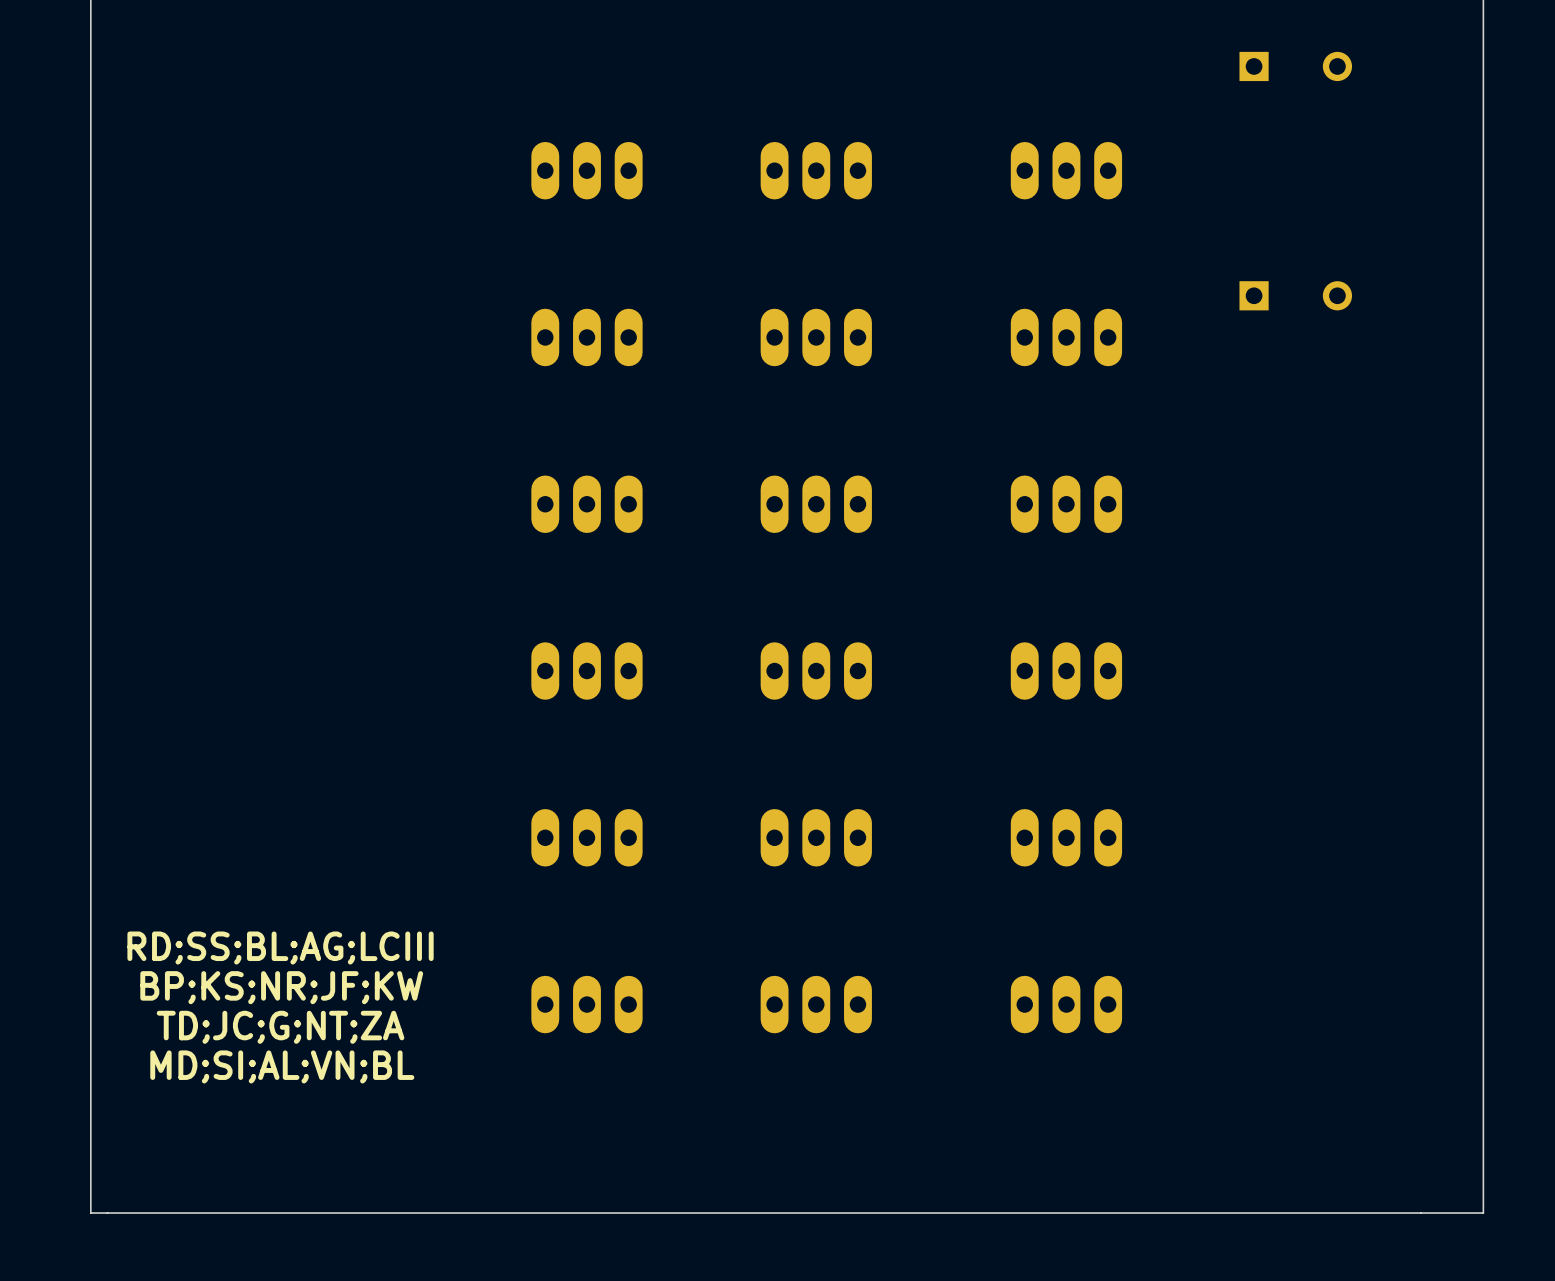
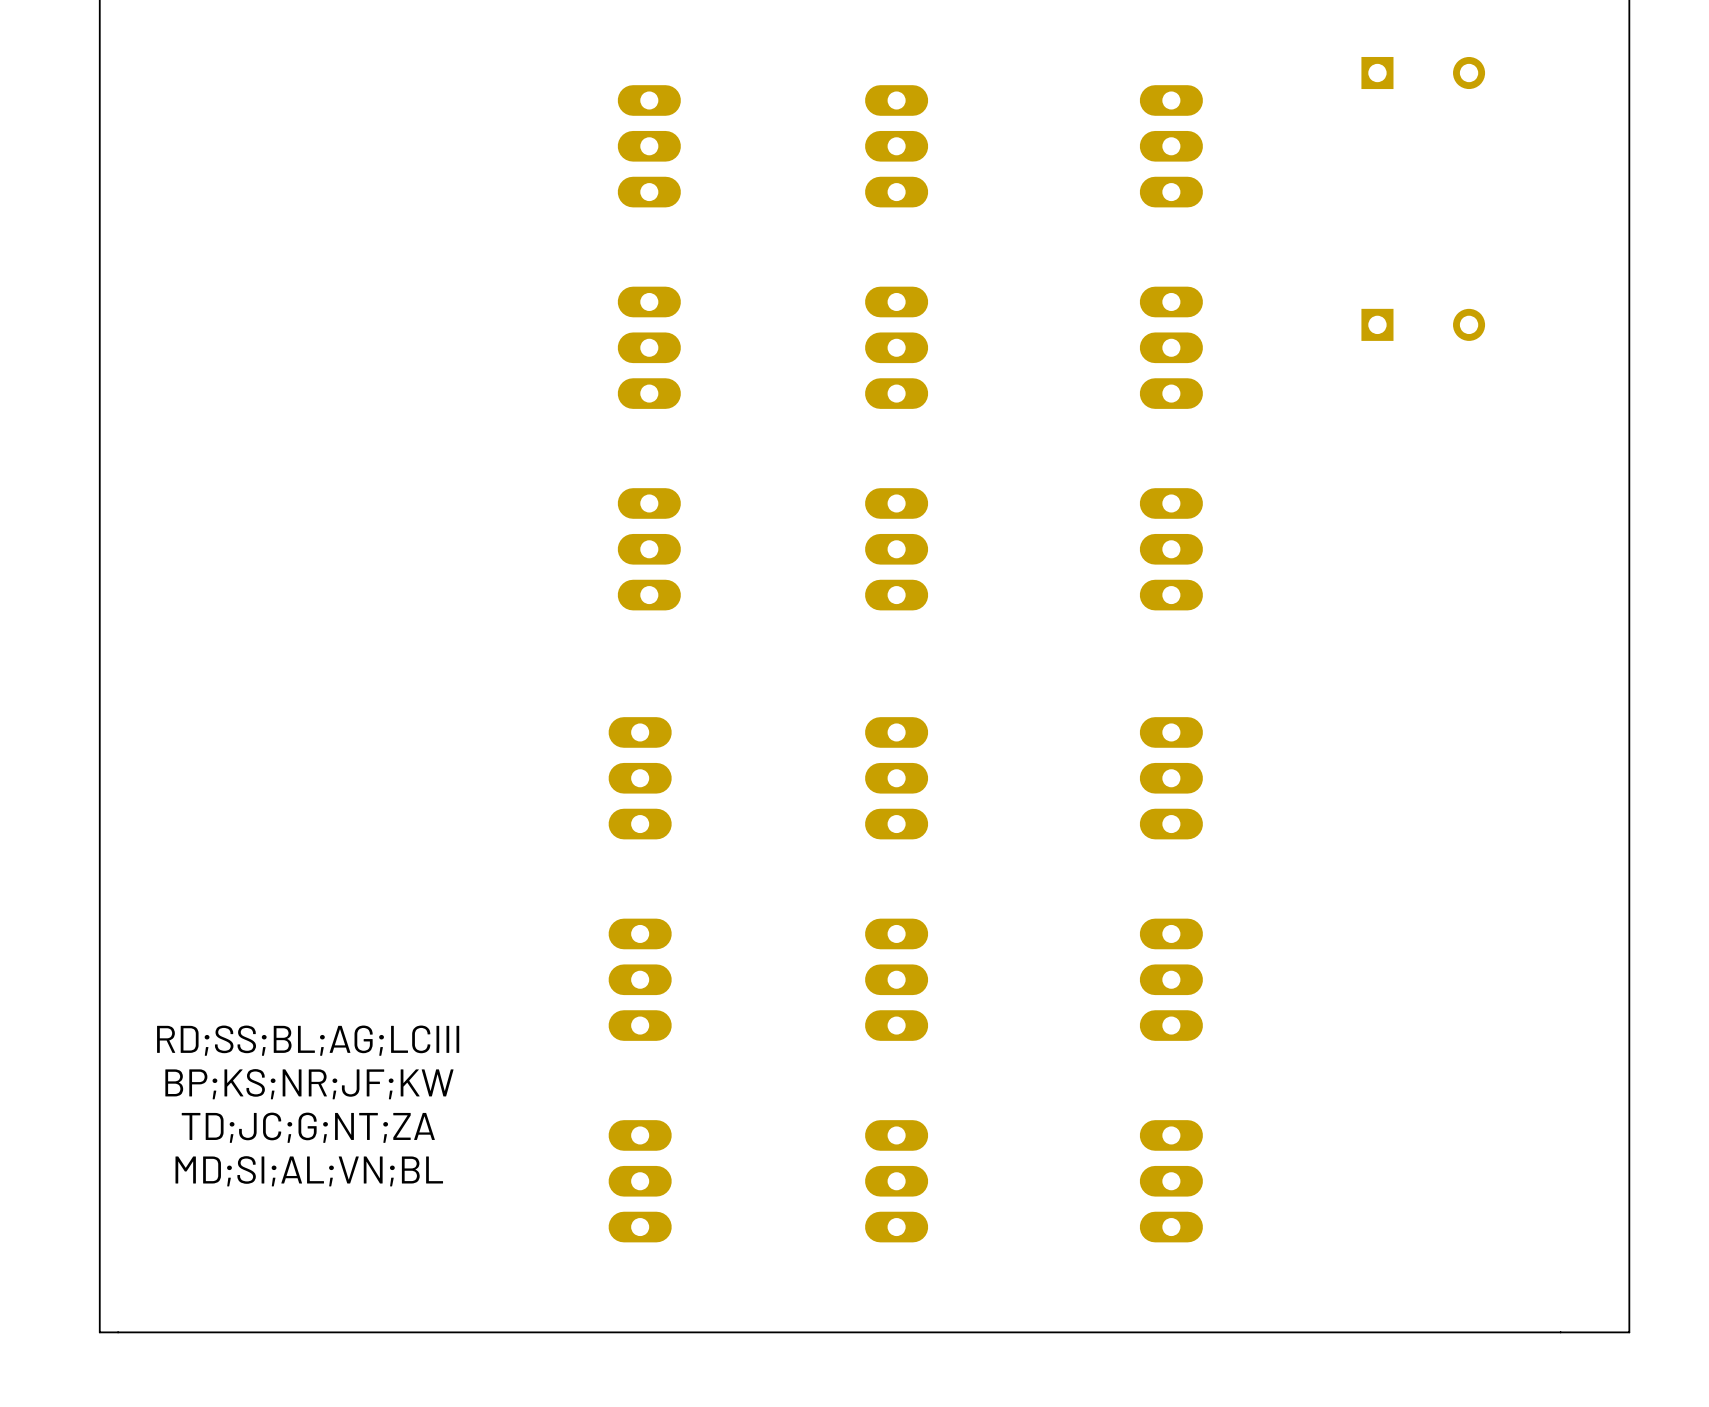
part rotation: 0° (586, 170) -> 90° clockwise (649, 146)
part rotation: 0° (816, 170) -> 90° clockwise (896, 146)
part rotation: 0° (1066, 170) -> 90° clockwise (1171, 146)
part rotation: 0° (586, 337) -> 90° clockwise (649, 347)
part rotation: 0° (816, 337) -> 90° clockwise (896, 347)
part rotation: 0° (1066, 337) -> 90° clockwise (1171, 347)
part rotation: 0° (586, 504) -> 90° clockwise (649, 549)
part rotation: 0° (816, 504) -> 90° clockwise (896, 549)
part rotation: 0° (1066, 504) -> 90° clockwise (1171, 549)
part rotation: 0° (586, 671) -> 90° clockwise (640, 778)
part rotation: 0° (816, 671) -> 90° clockwise (896, 778)
part rotation: 0° (1066, 671) -> 90° clockwise (1171, 778)
part rotation: 0° (586, 837) -> 90° clockwise (640, 979)
part rotation: 0° (816, 837) -> 90° clockwise (896, 979)
part rotation: 0° (1066, 837) -> 90° clockwise (1171, 979)
part: (586, 1004) -> none
part: (816, 1004) -> none
part: (1066, 1004) -> none
part: none -> (640, 1181)
part: none -> (896, 1181)
part: none -> (1171, 1181)

